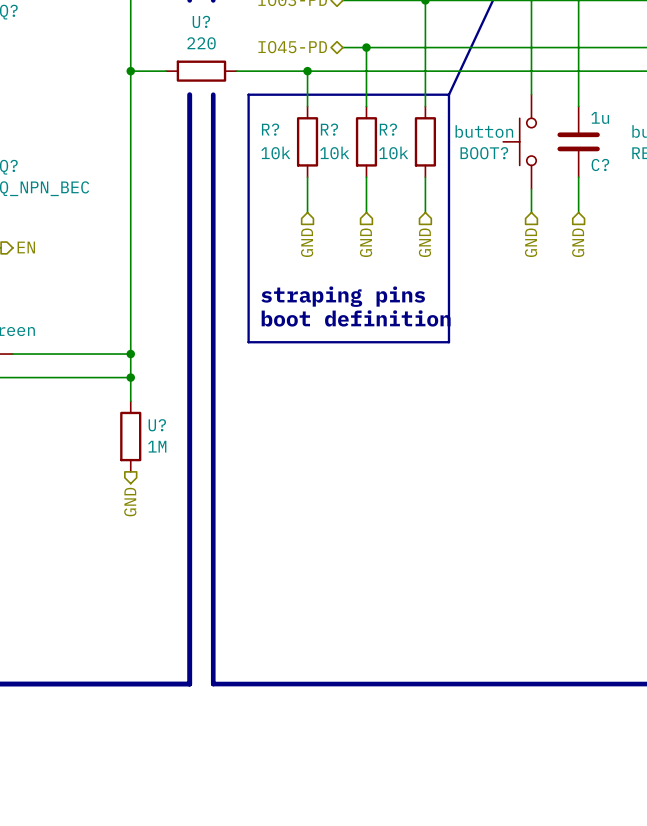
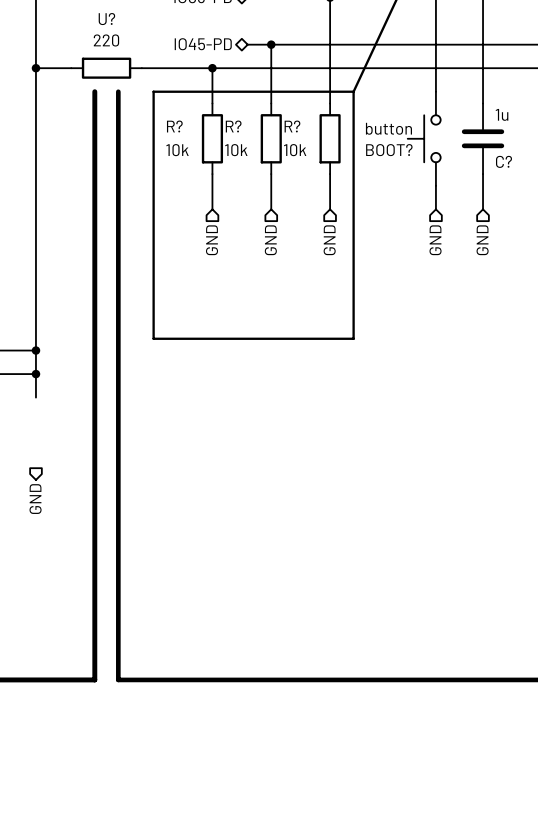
text: straping pins (343, 296) -> none
text: boot definition (356, 318) -> none
U?: 1M (130, 436) -> none

